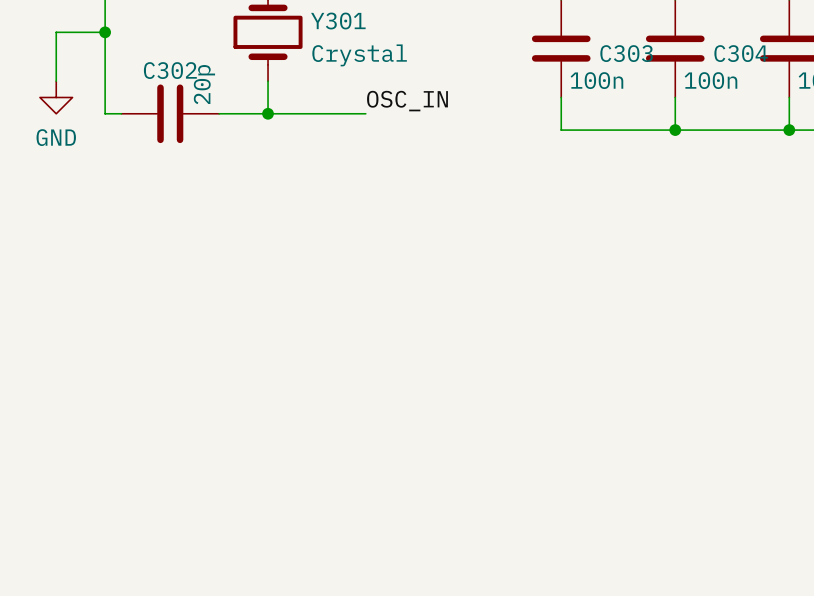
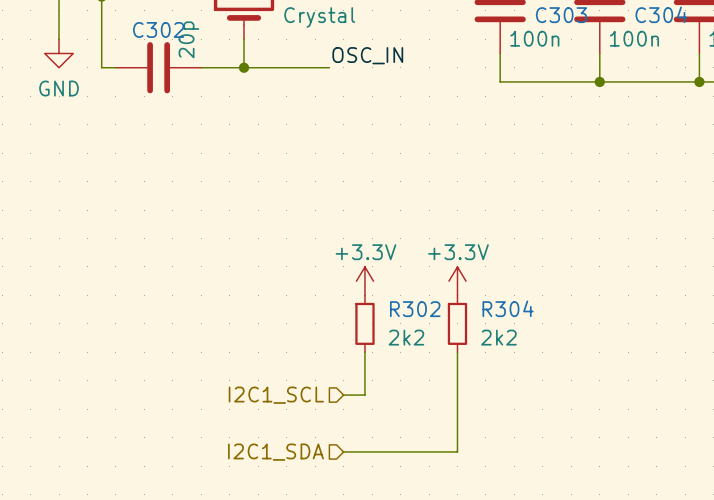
power symbol: none -> +3.3V (364, 281)
power symbol: none -> +3.3V (457, 281)
R302: none -> 2k2 (364, 323)
R304: none -> 2k2 (457, 323)
wire: none -> (364, 352) (364, 395) (343, 395)
wire: none -> (457, 352) (457, 451) (343, 451)
hierarchical label: none -> I2C1_SCL (276, 395)
hierarchical label: none -> I2C1_SDA (275, 452)

